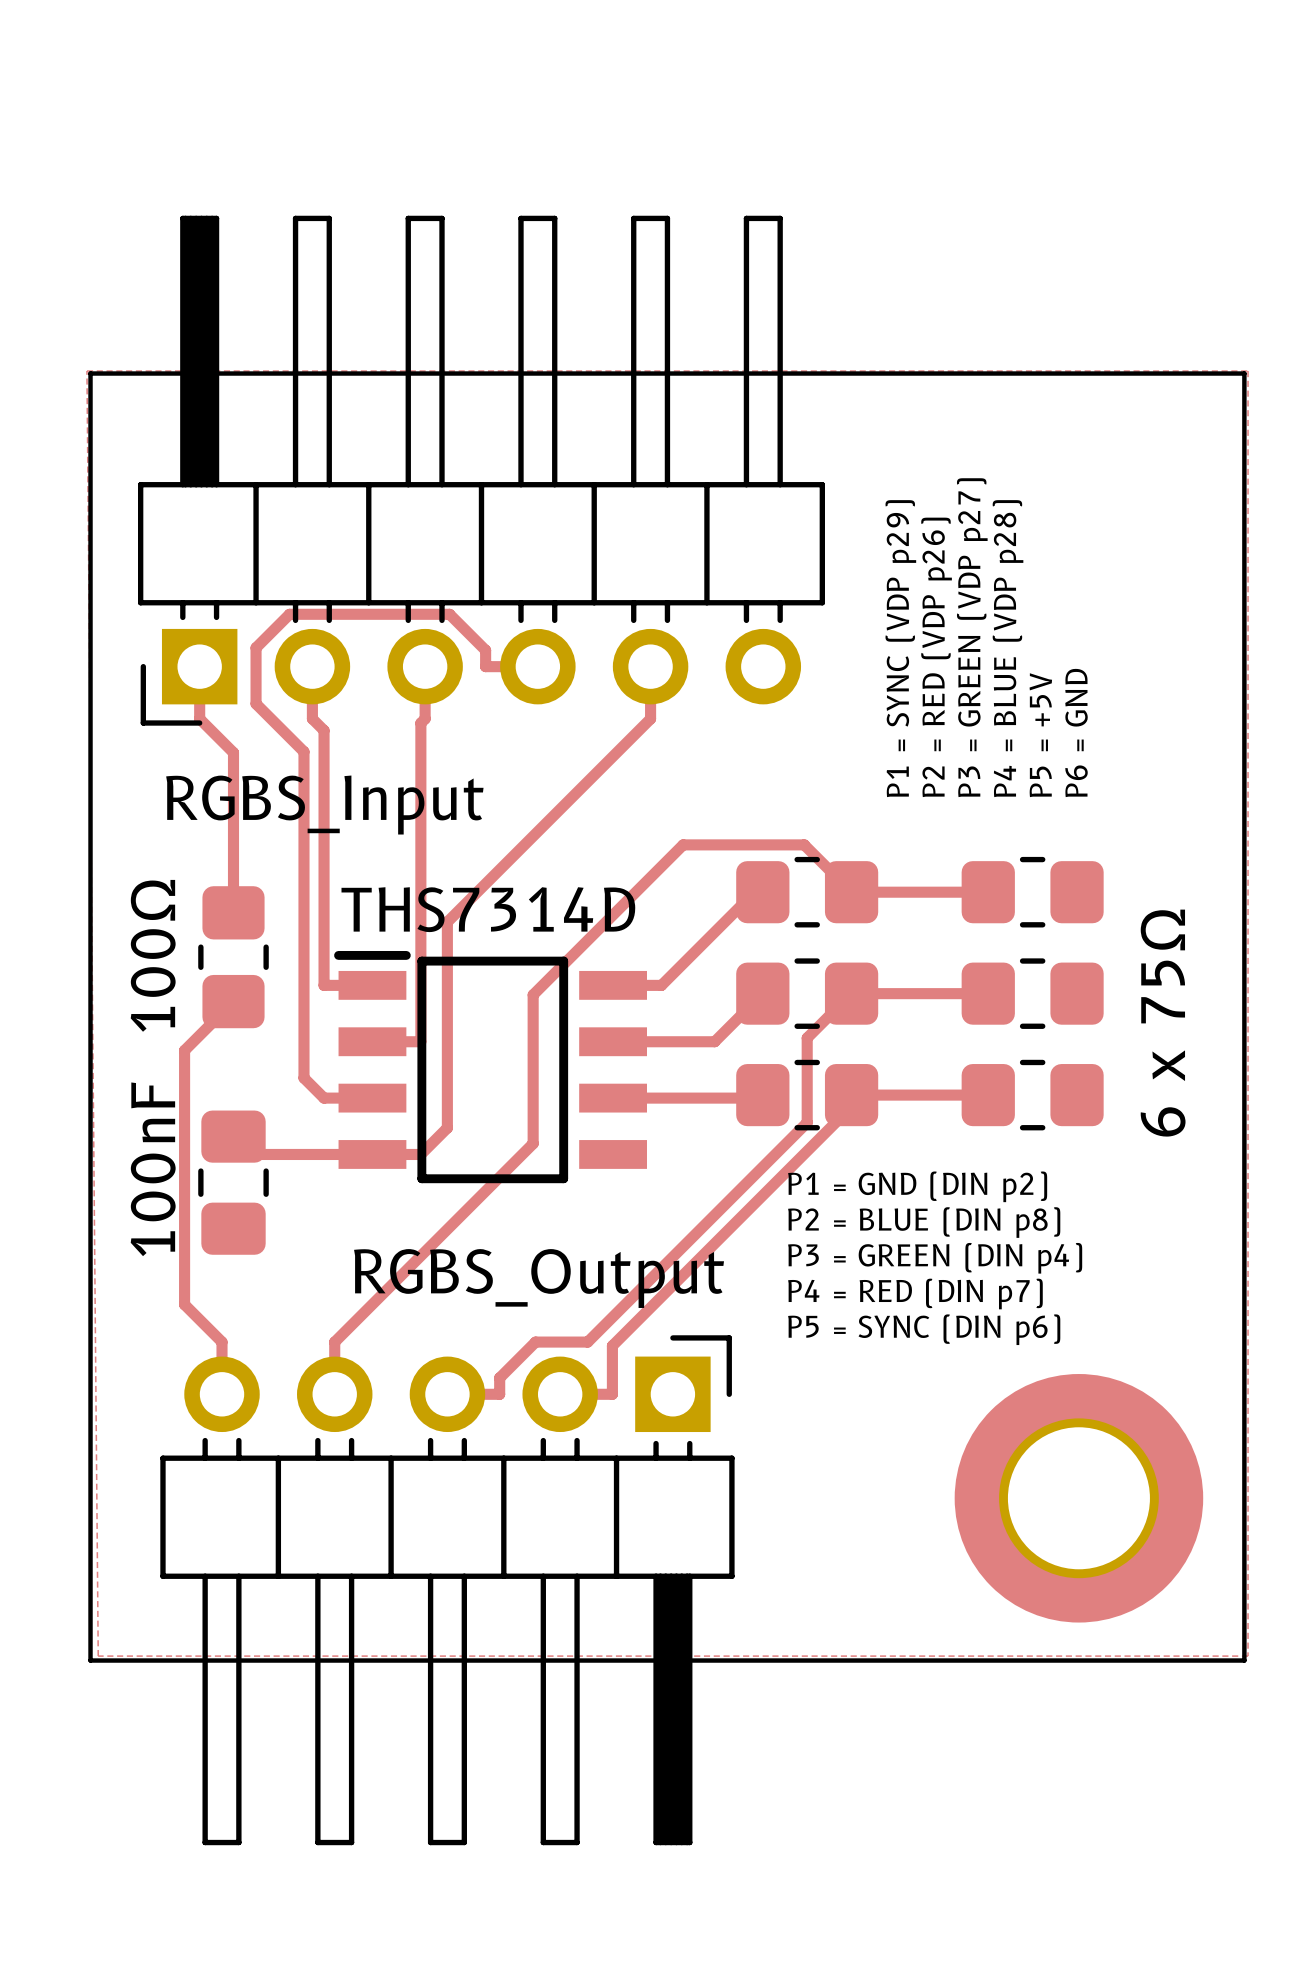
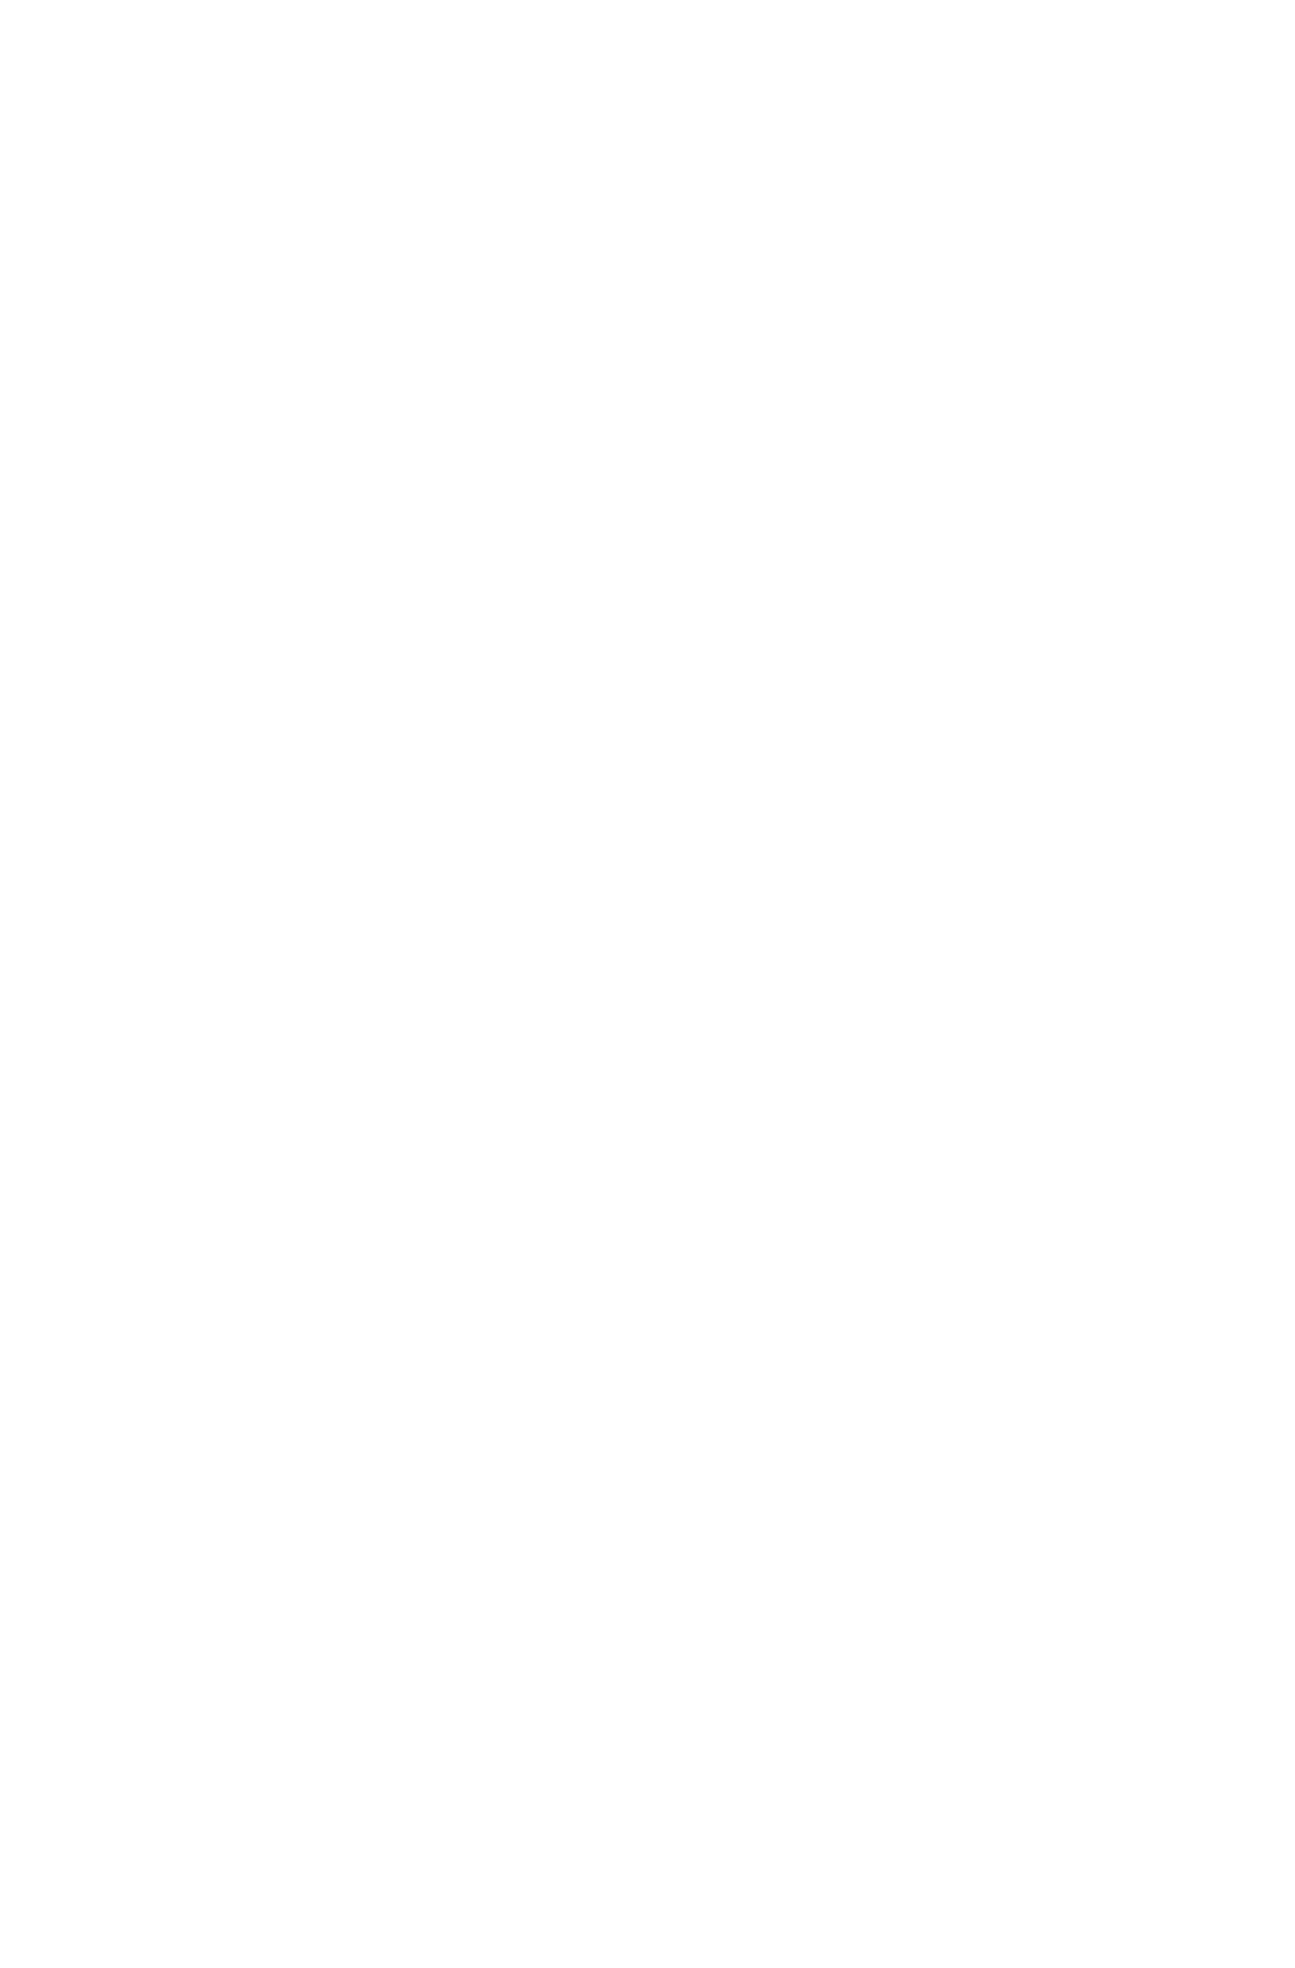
top zone outline: (86, 371) (1248, 371) (1248, 1656) (98, 1656) (86, 371) -> none
board edge: (90, 373) (90, 1660) (1244, 1660) (1244, 373) (90, 373) -> none
part: RGBS_Input (481, 470) -> none
text: P3 = GREEN (VDP p27) (972, 637) -> none
text: P1 = SYNC (VDP p29) (900, 648) -> none
text: P4 = BLUE (VDP p28) (1008, 648) -> none
text: P2 = RED (VDP p26) (936, 657) -> none
top track: (199, 666) (199, 718) (233, 752) (233, 912) -> none
top track: (312, 666) (312, 718) (324, 730) (324, 985) (372, 985) -> none
top track: (425, 666) (425, 718) (420, 723) (420, 1041) (372, 1041) -> none
top track: (537, 666) (485, 666) (485, 650) (449, 614) (289, 614) (256, 647) (256, 703) (303, 751) (303, 1078) (324, 1098) (372, 1098) -> none
top track: (650, 666) (650, 718) (447, 922) (447, 1127) (420, 1154) (251, 1154) (233, 1136) -> none
text: P6 = GND (1076, 733) -> none
text: P5 = +5V (1040, 735) -> none
top track: (762, 892) (754, 892) (661, 985) (613, 985) -> none
part: (807, 892) -> none
top track: (988, 892) (851, 892) (804, 844) (683, 844) (533, 994) (533, 1143) (334, 1342) (334, 1394) -> none
part: (1032, 892) -> none
part: 100Ω (233, 957) -> none
top track: (762, 993) (714, 1041) (613, 1041) -> none
part: (807, 993) -> none
top track: (988, 993) (851, 993) (807, 1038) (807, 1122) (587, 1342) (535, 1342) (499, 1377) (499, 1394) (447, 1394) -> none
part: (1032, 993) -> none
top track: (233, 1001) (184, 1050) (184, 1304) (222, 1342) (222, 1394) -> none
text: 6 x 75Ω (1163, 1023) -> none
part: THS7314D (490, 1067) -> none
top track: (762, 1095) (759, 1098) (613, 1098) -> none
part: (807, 1095) -> none
top track: (988, 1095) (851, 1095) (851, 1106) (612, 1345) (612, 1394) (560, 1394) -> none
part: (1032, 1095) -> none
part: 100nF (233, 1182) -> none
text: P1 = GND (DIN p2) (917, 1186) -> none
text: P2 = BLUE (DIN p8) (924, 1222) -> none
text: P3 = GREEN (DIN p4) (935, 1258) -> none
text: P4 = RED (DIN p7) (915, 1293) -> none
text: P5 = SYNC (DIN p6) (924, 1329) -> none
part: (1078, 1498) -> none
part: RGBS_Output (447, 1590) -> none

